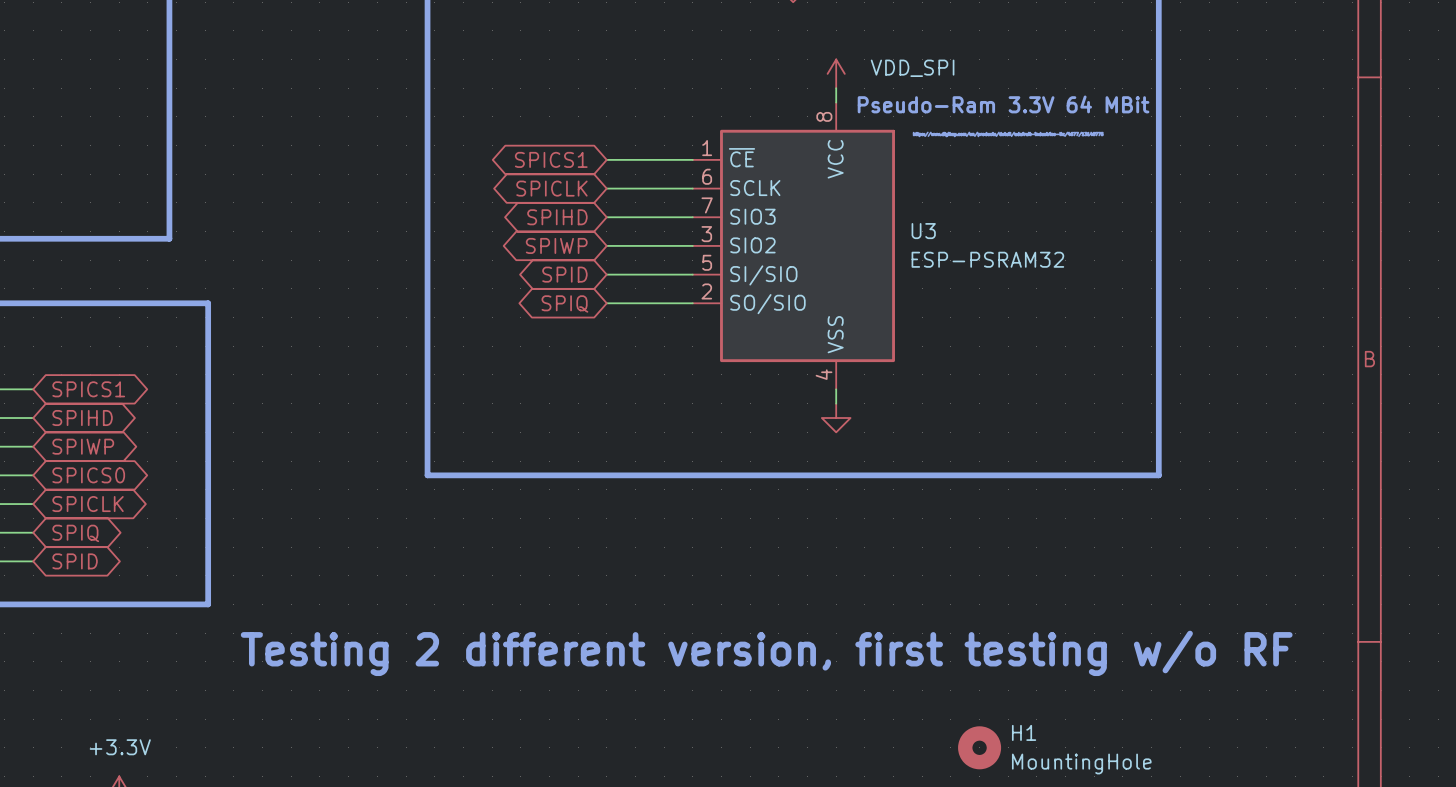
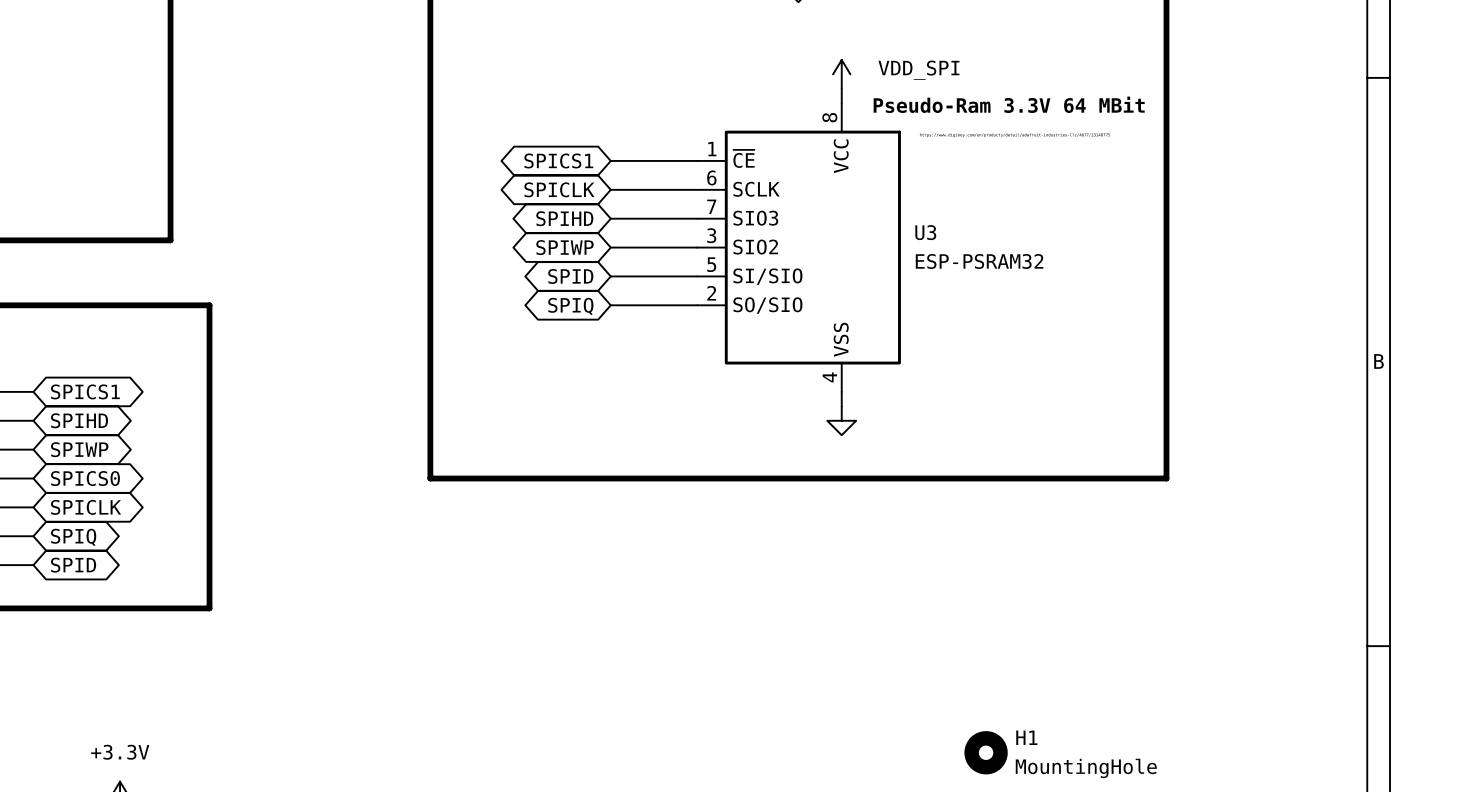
text: Testing 2 different version, first testing w/o RF (766, 653) -> none

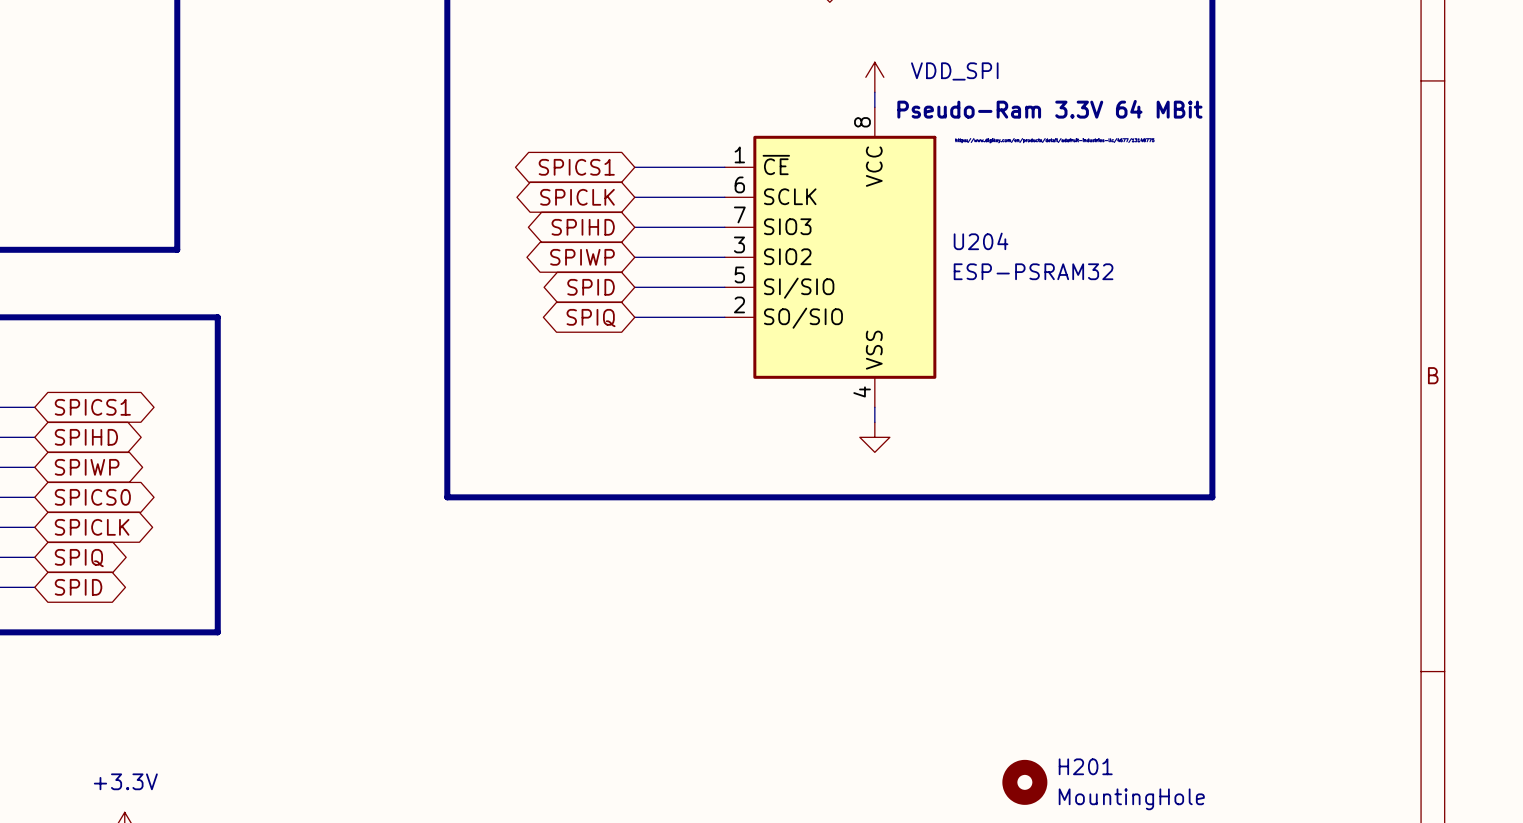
U3 name: U3 (925, 232) -> U204 (981, 241)
H1 name: H1 (1026, 737) -> H201 (1085, 766)

